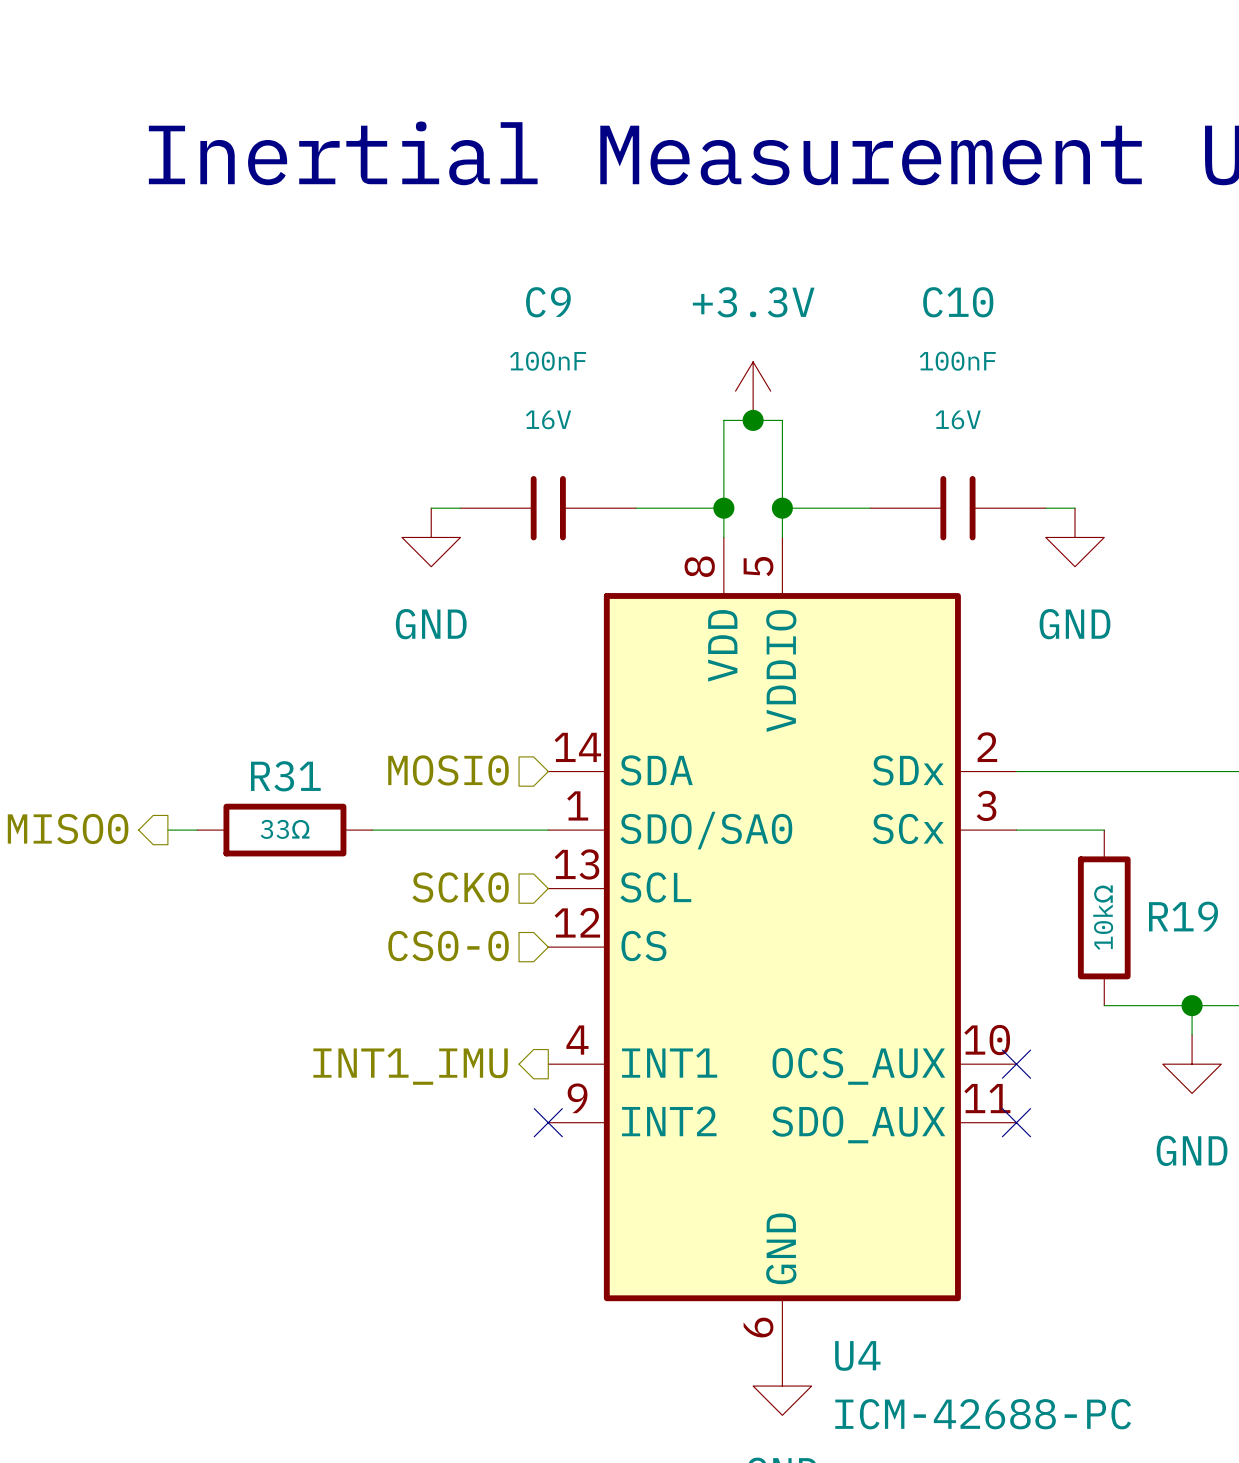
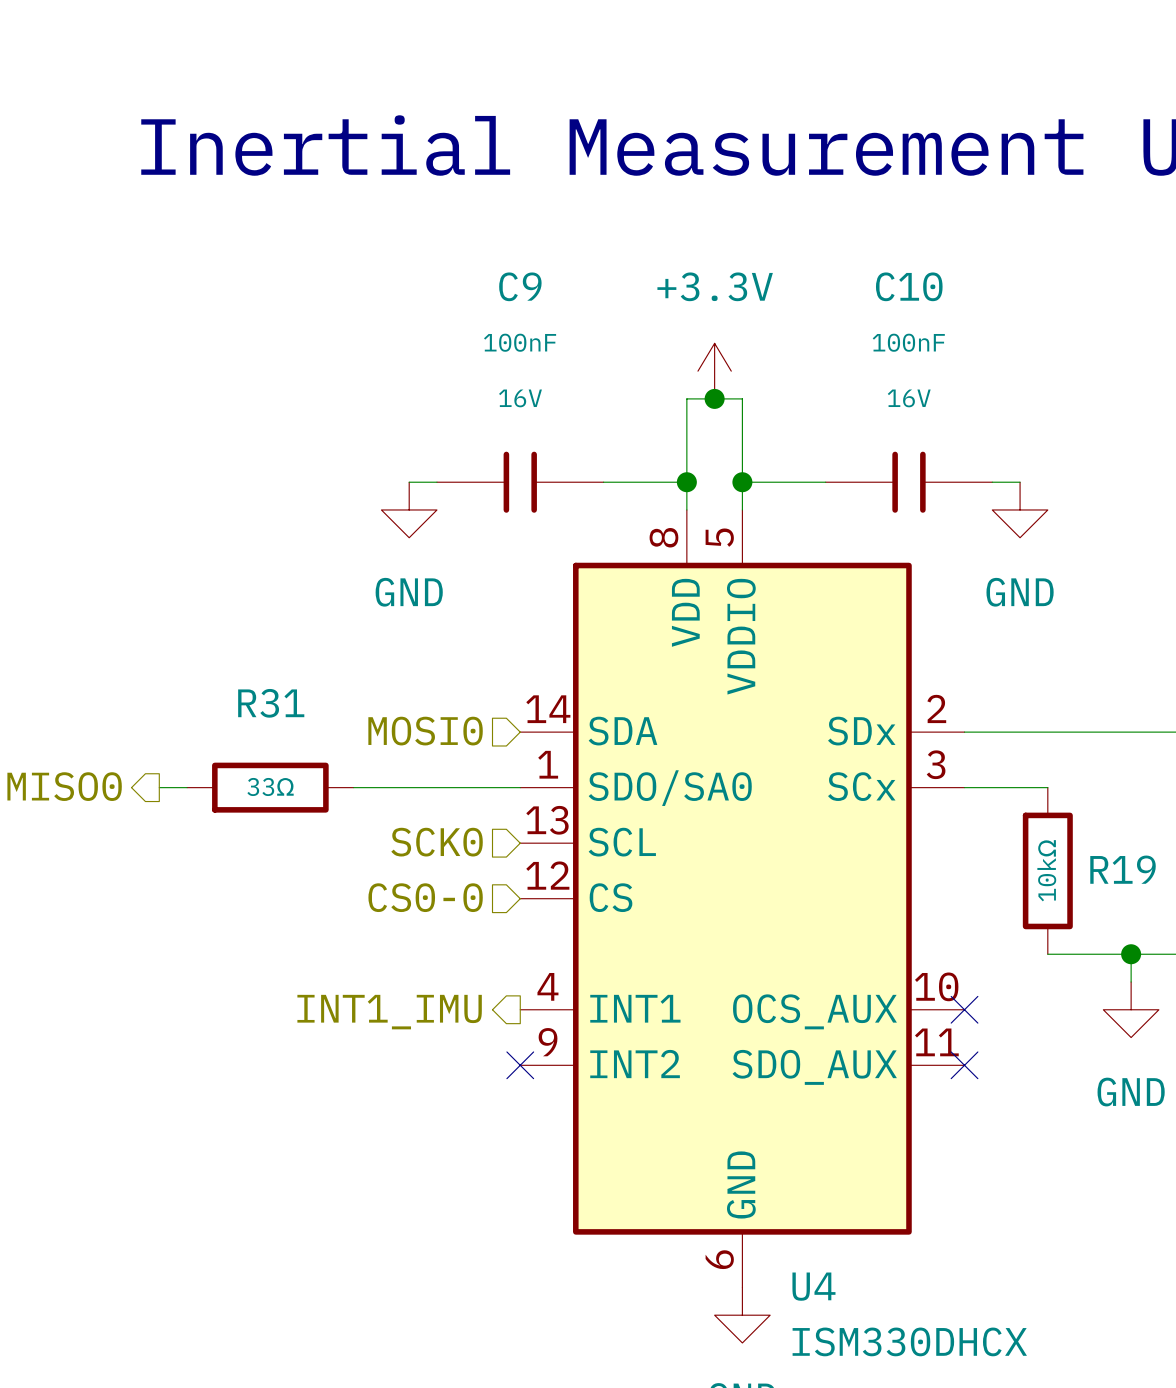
R31 name position: R31 (285, 776) -> R31 (271, 703)
U4 value: ICM-42688-PC (983, 1414) -> ISM330DHCX (909, 1341)

